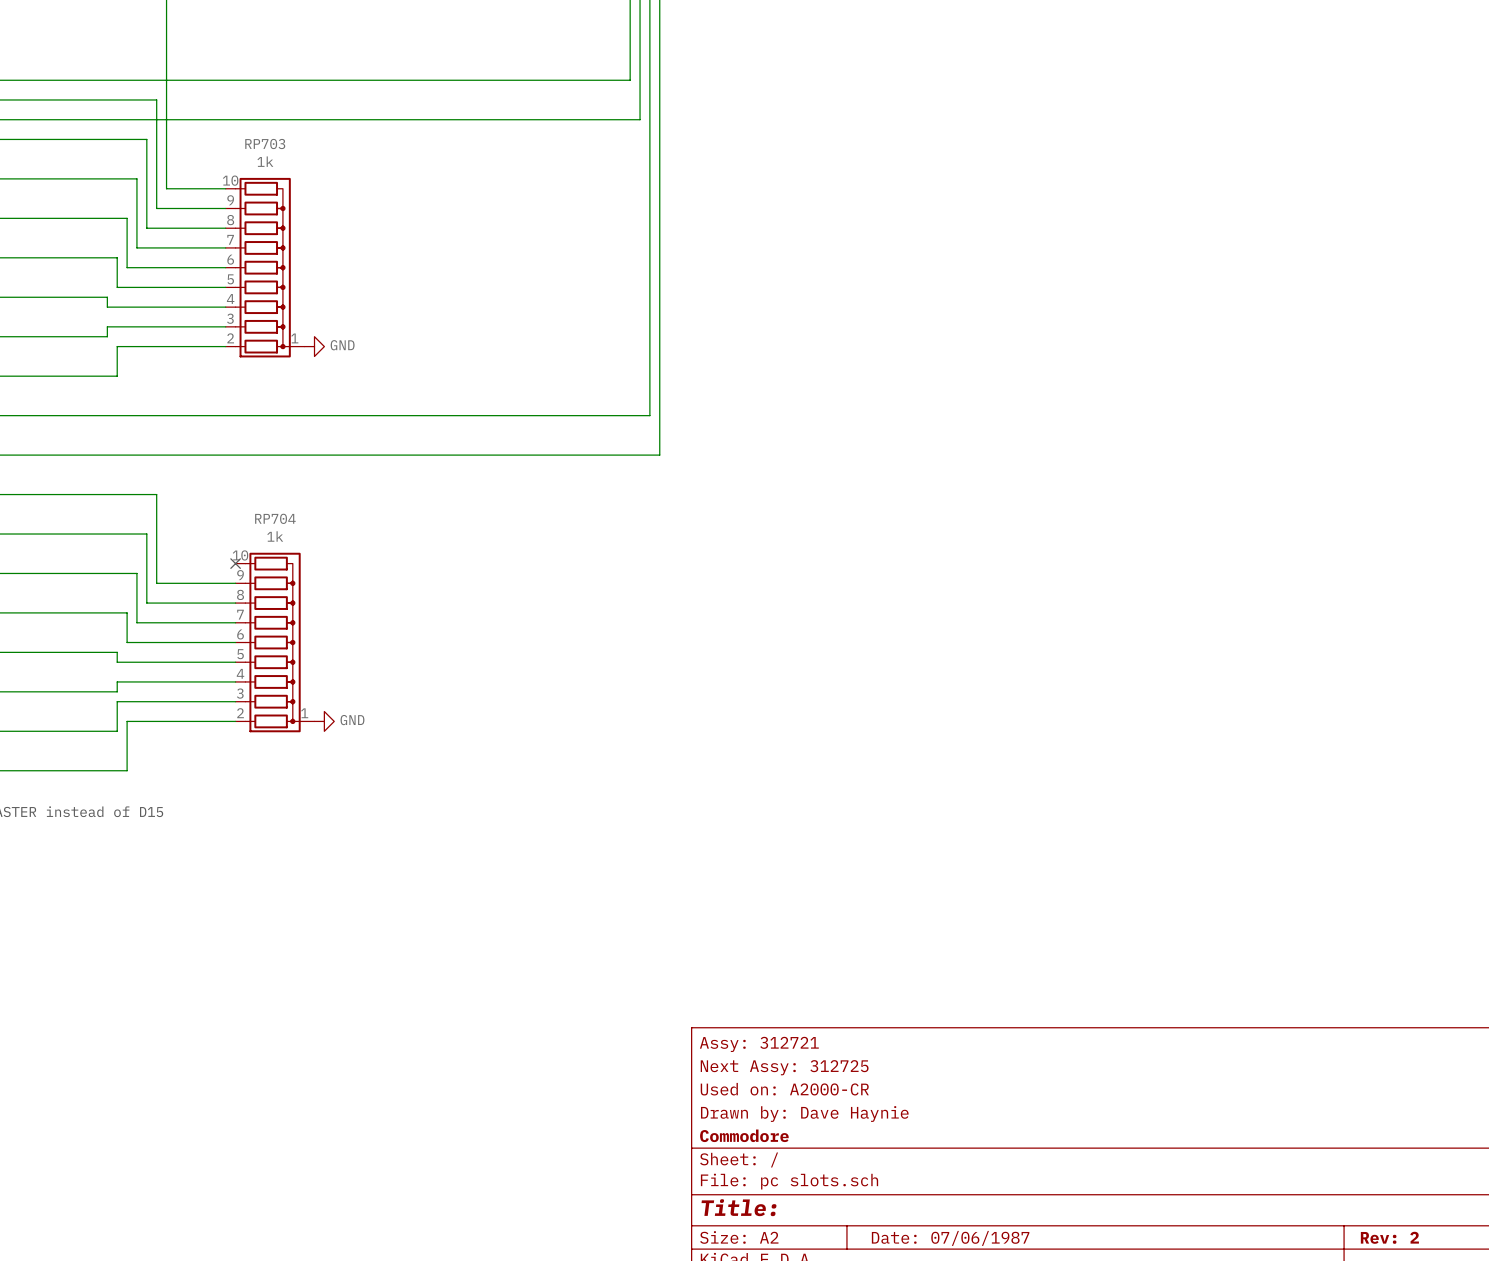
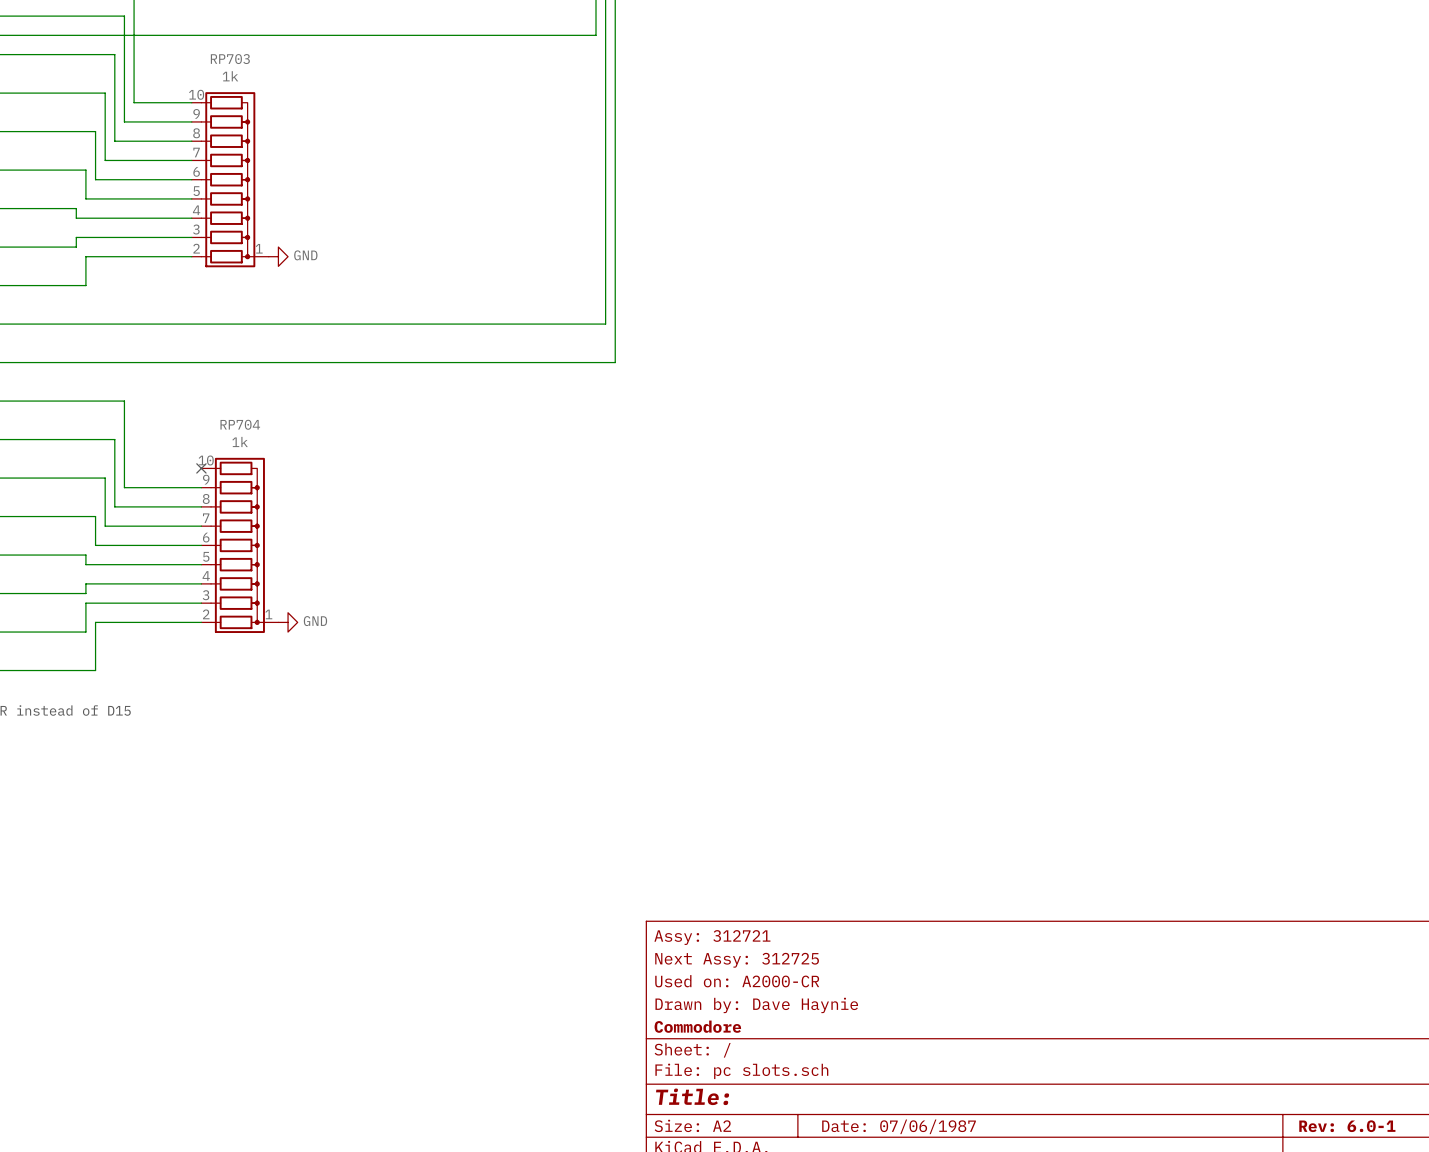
title block: Rev: 2 (1389, 1237) -> Rev: 6.0-1 (1347, 1126)

